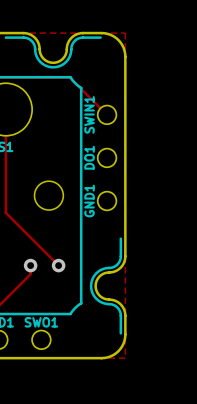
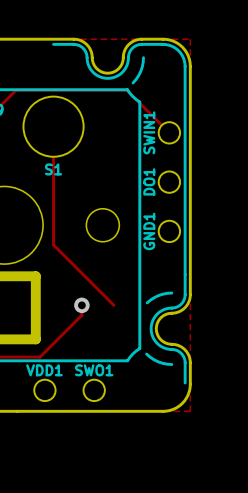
line: none -> (161, 44) (176, 48) (182, 55) (184, 63) (185, 274)
line: none -> (143, 57) (140, 71) (133, 82)
line: none -> (171, 293) (158, 295) (147, 302)
via: (58, 265) -> none
line: none -> (146, 354) (158, 361) (171, 364)

